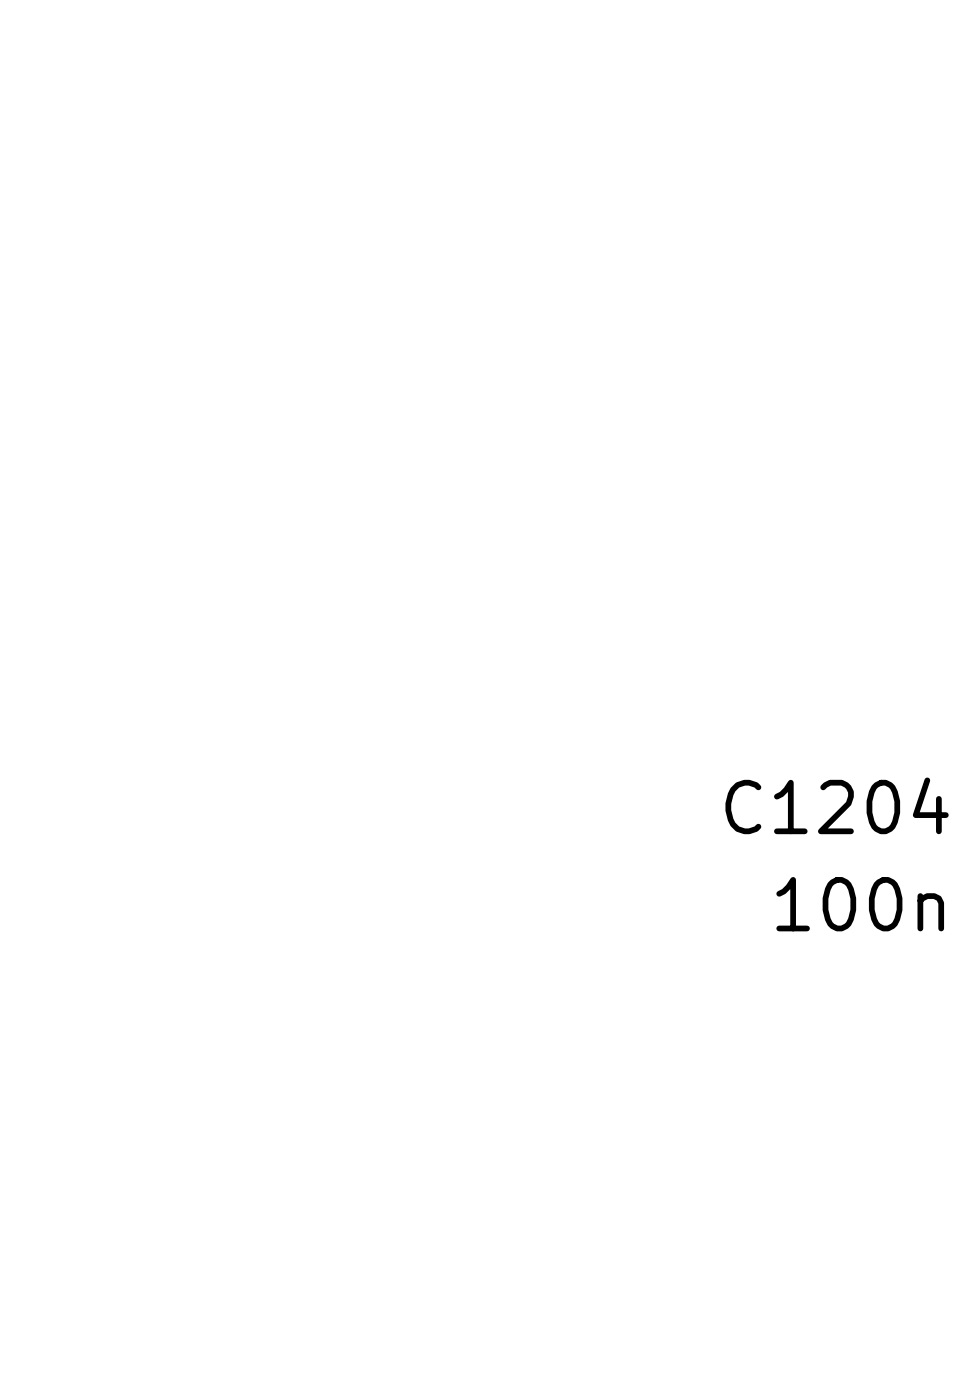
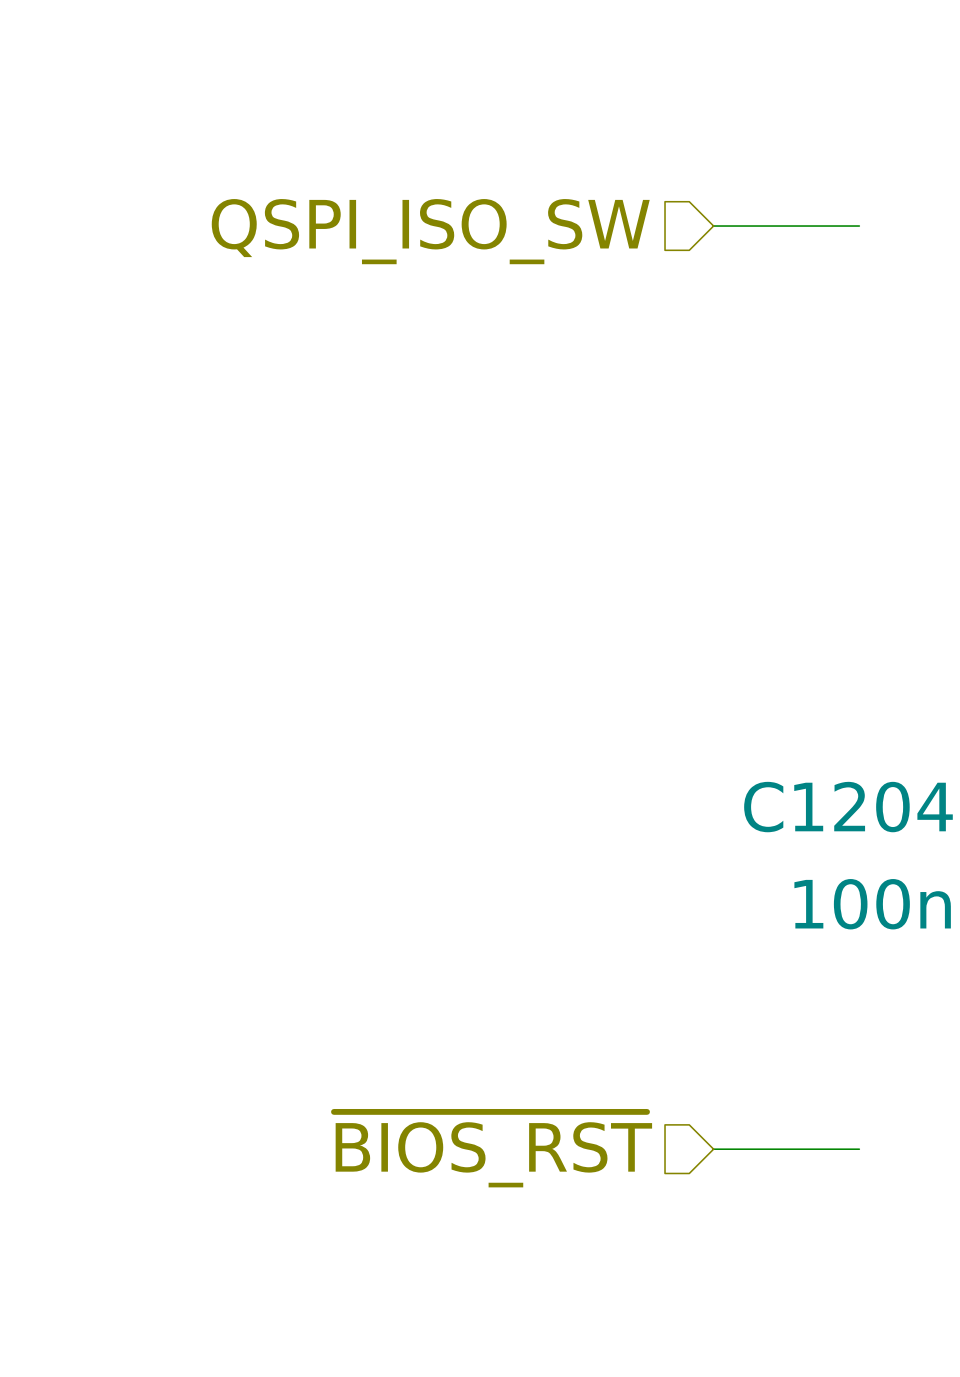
hierarchical label: none -> QSPI_ISO_SW (430, 231)
wire: none -> (713, 226) (859, 226)
hierarchical label: none -> ~{BIOS_RST} (493, 1149)
wire: none -> (713, 1149) (859, 1149)

